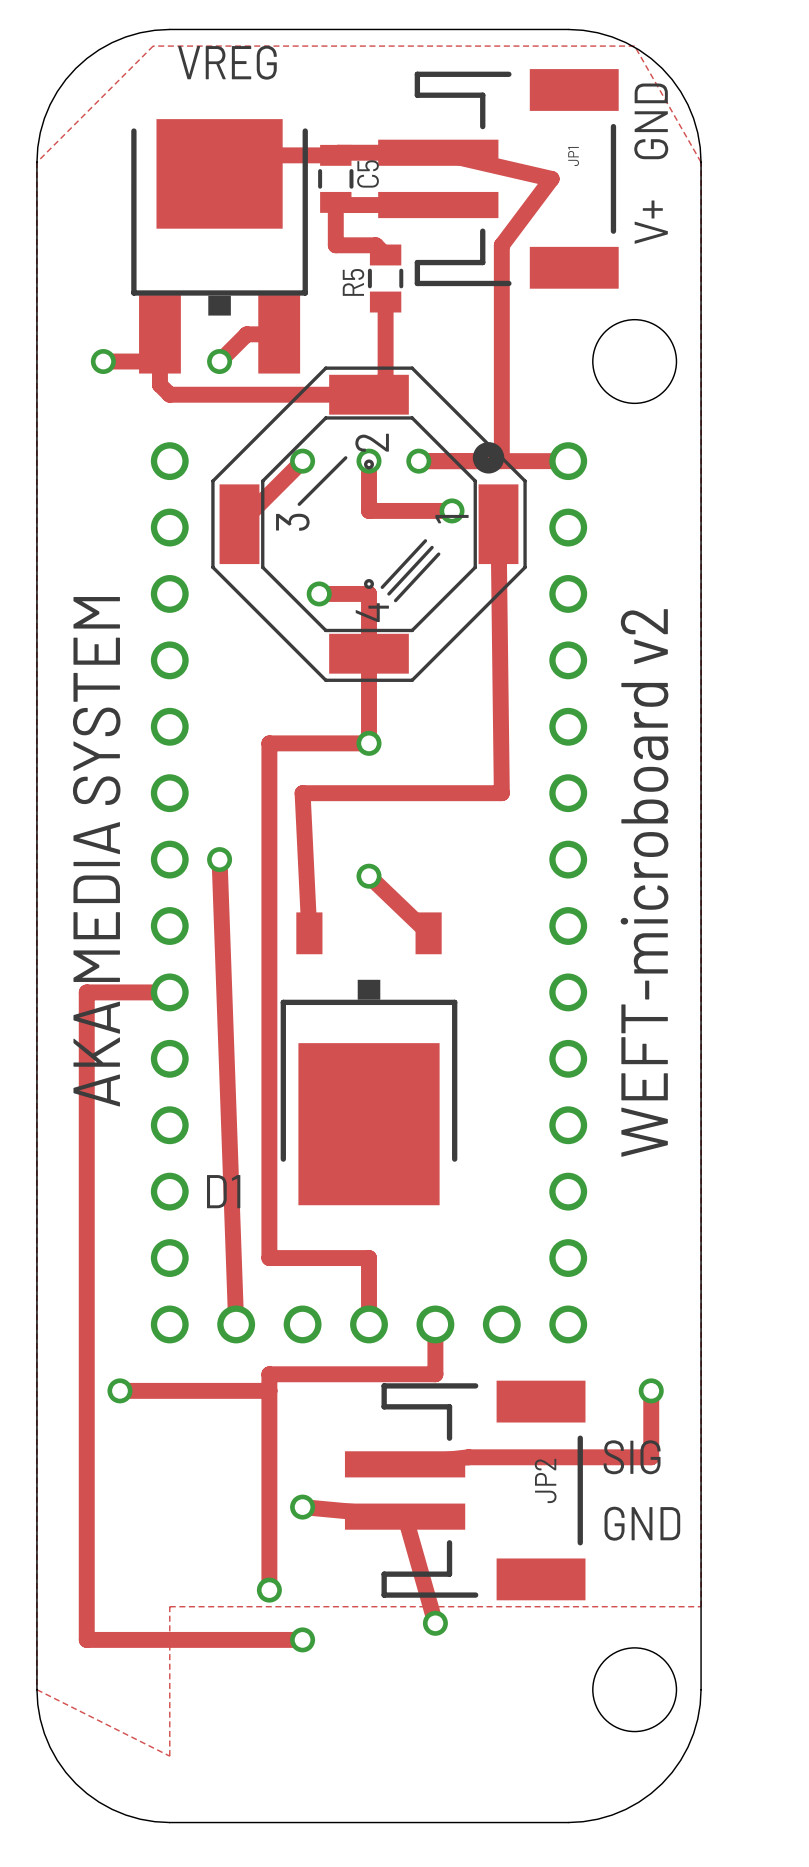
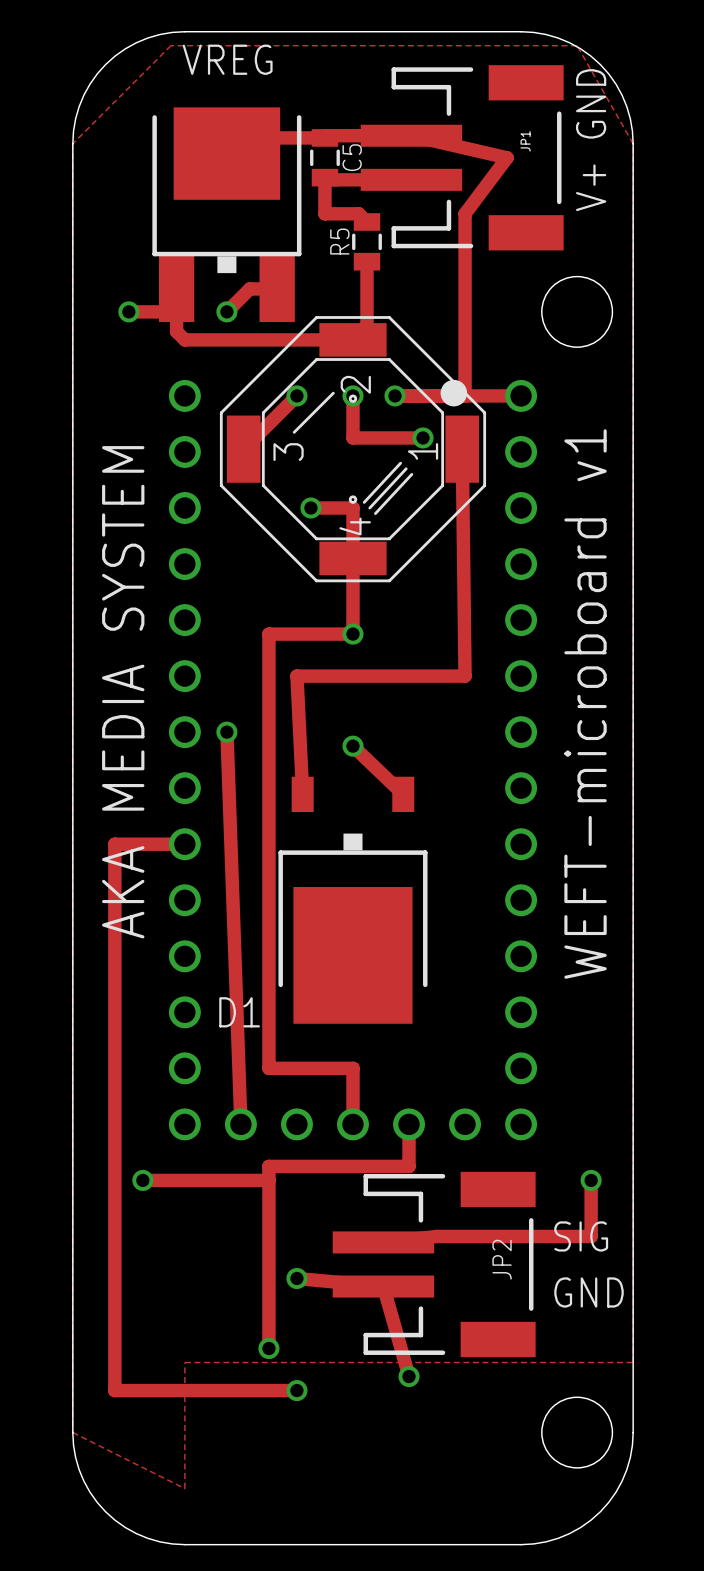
text: WEFT-microboard v2 (644, 882) -> WEFT-microboard v1 (585, 704)

